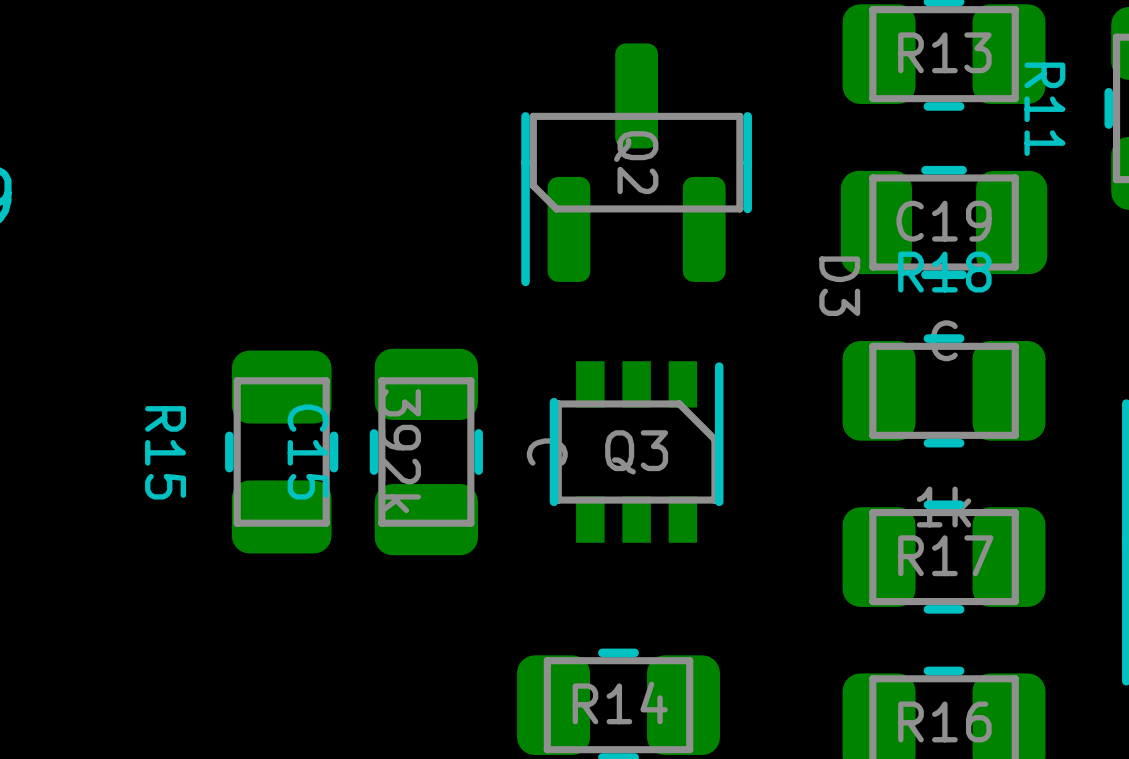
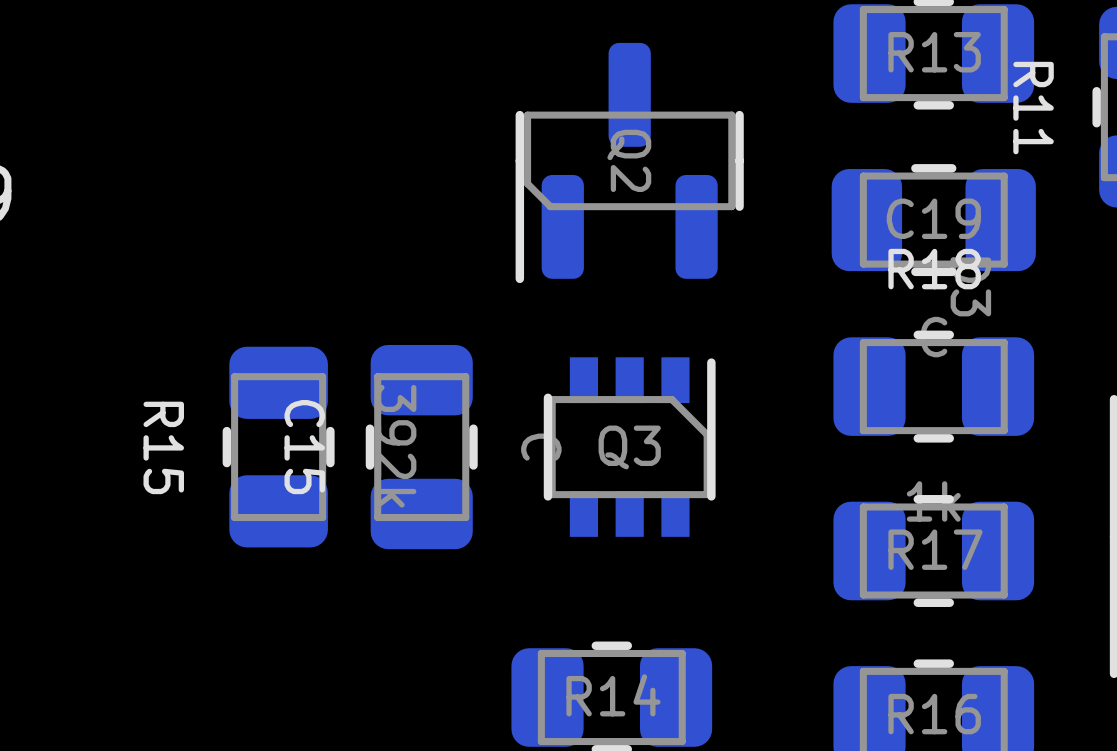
D3 position: (839, 286) -> (970, 286)

